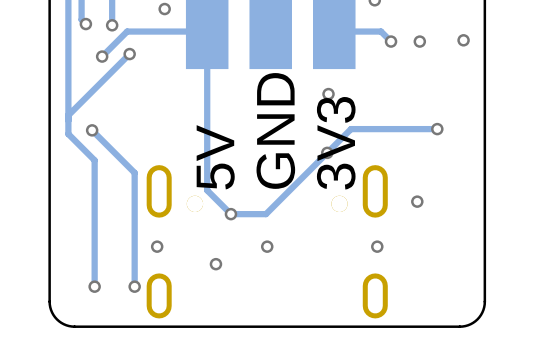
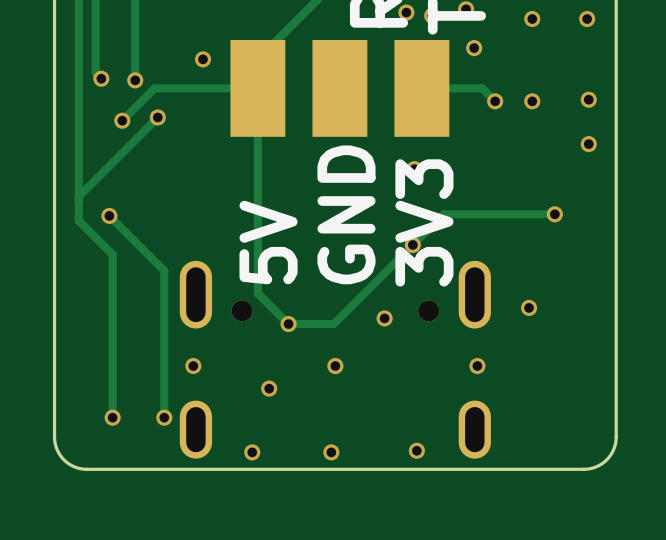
via: none -> (588, 144)
via: none -> (384, 318)
via: none -> (416, 450)
via: none -> (252, 452)
via: none -> (331, 452)

